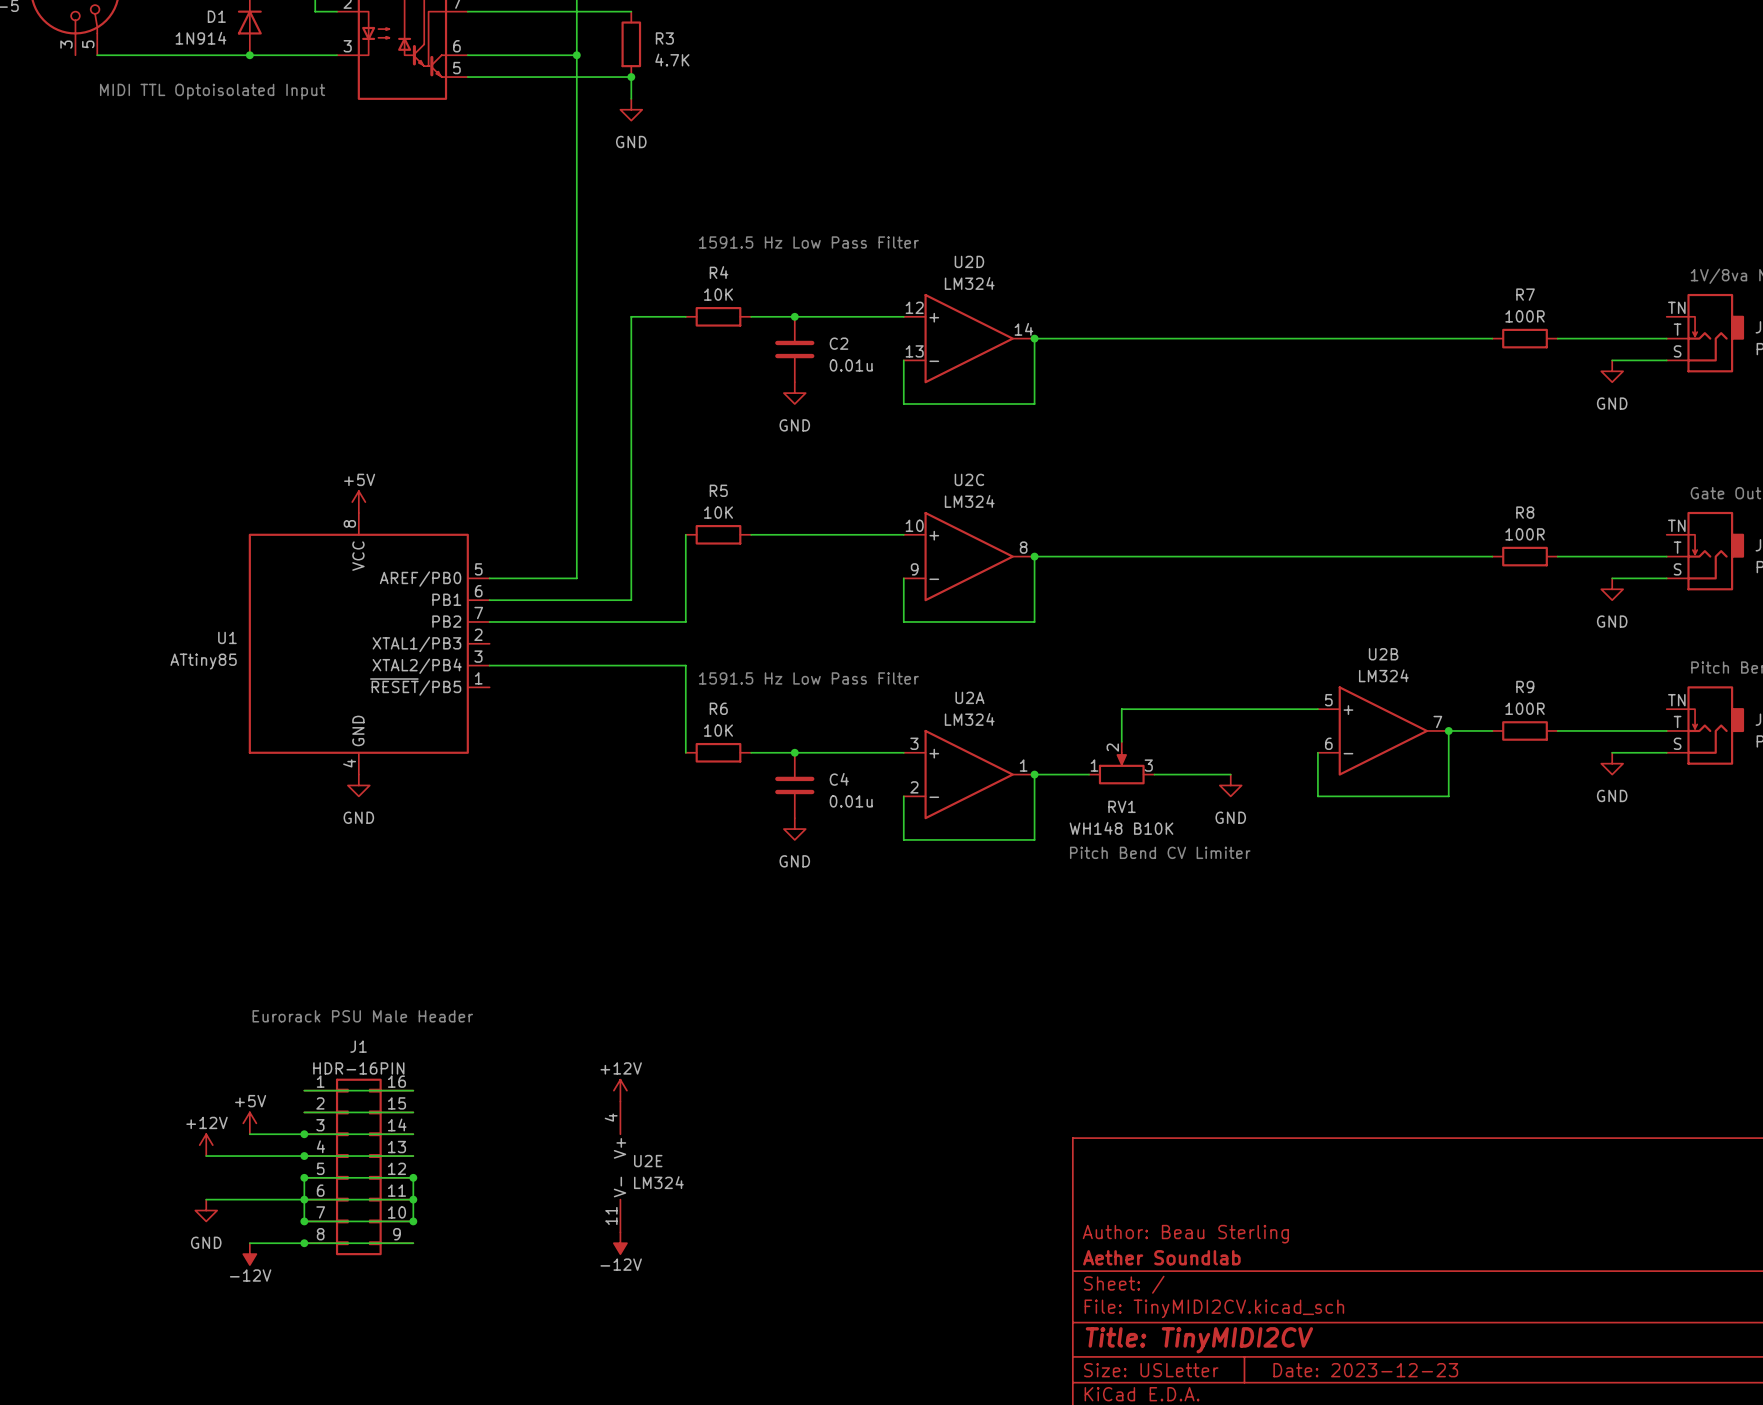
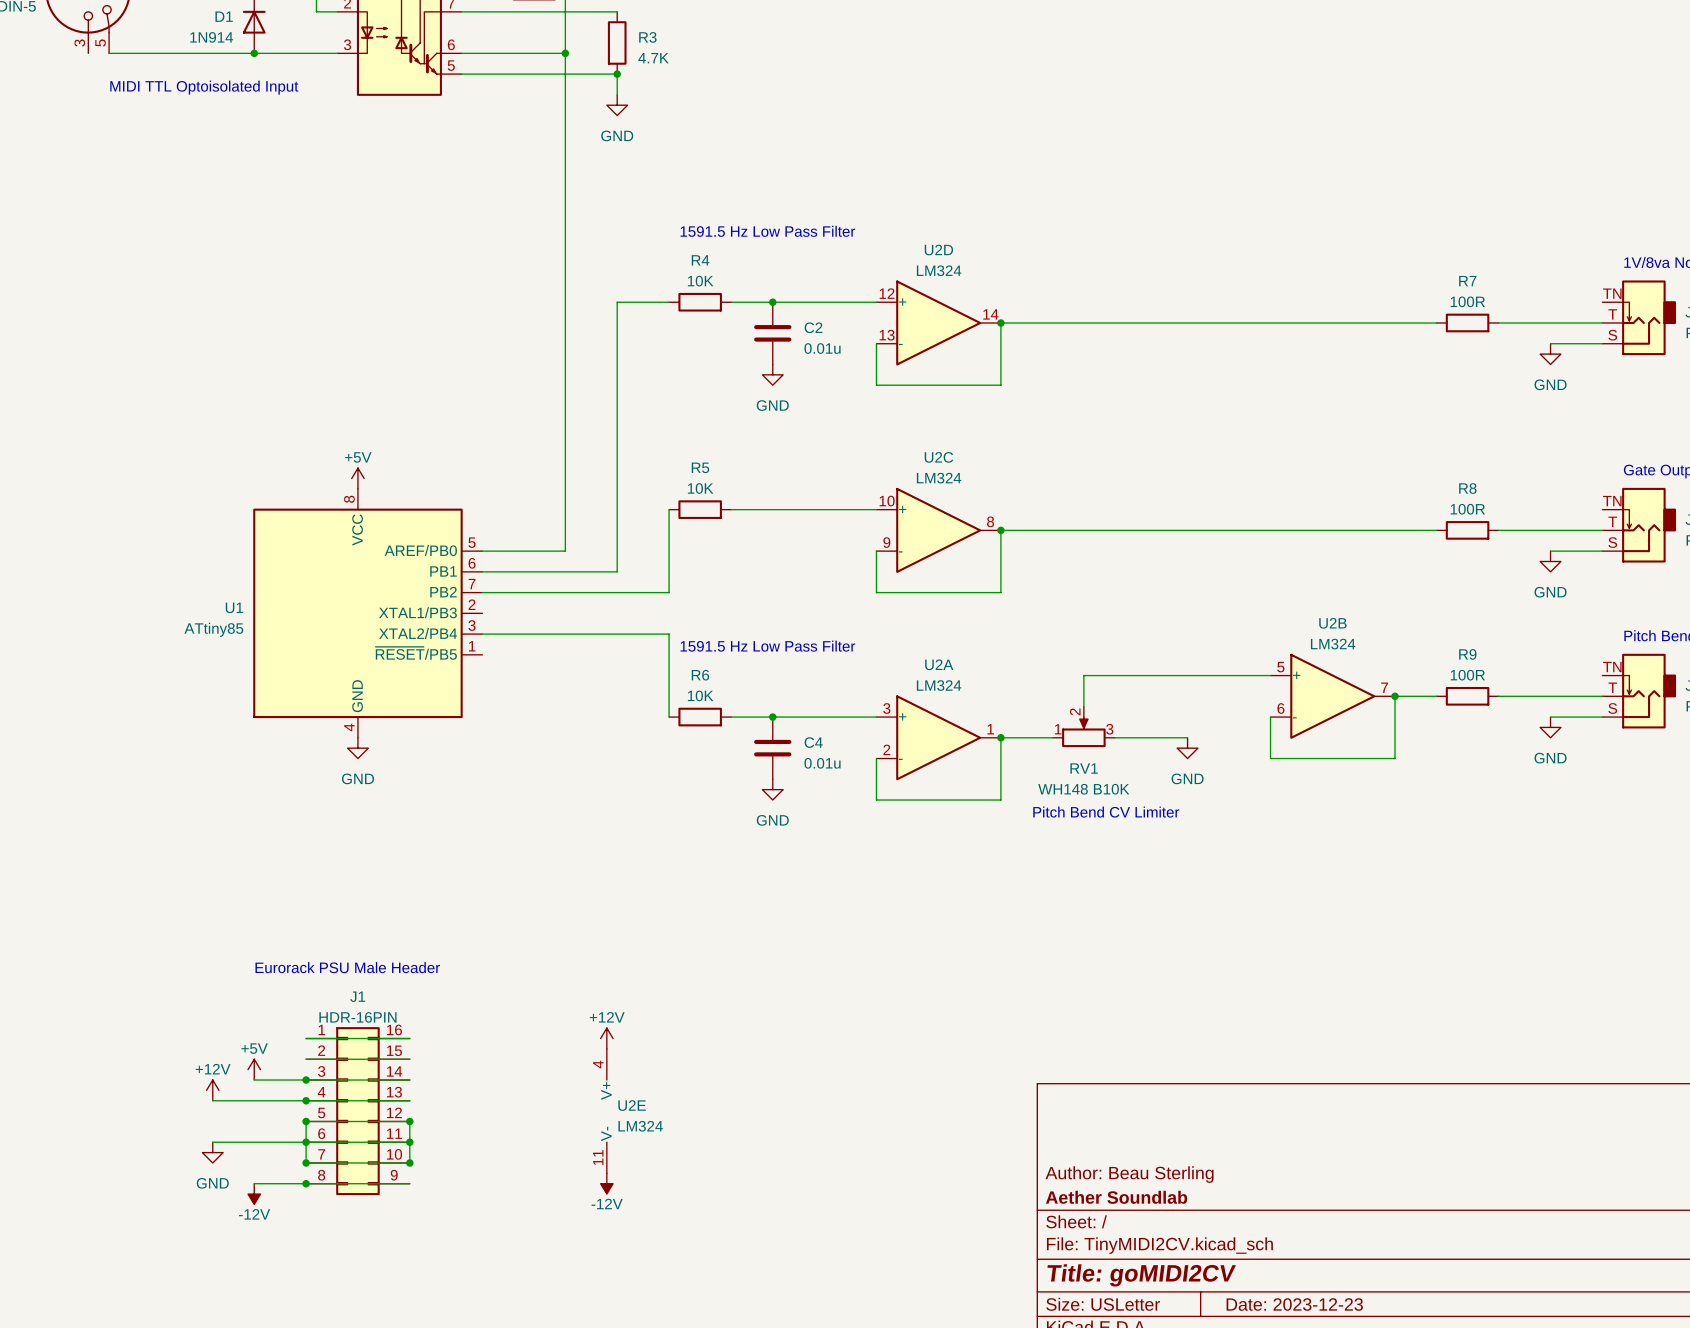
title block: Title: TinyMIDI2CV (1199, 1340) -> Title: goMIDI2CV (1141, 1275)

